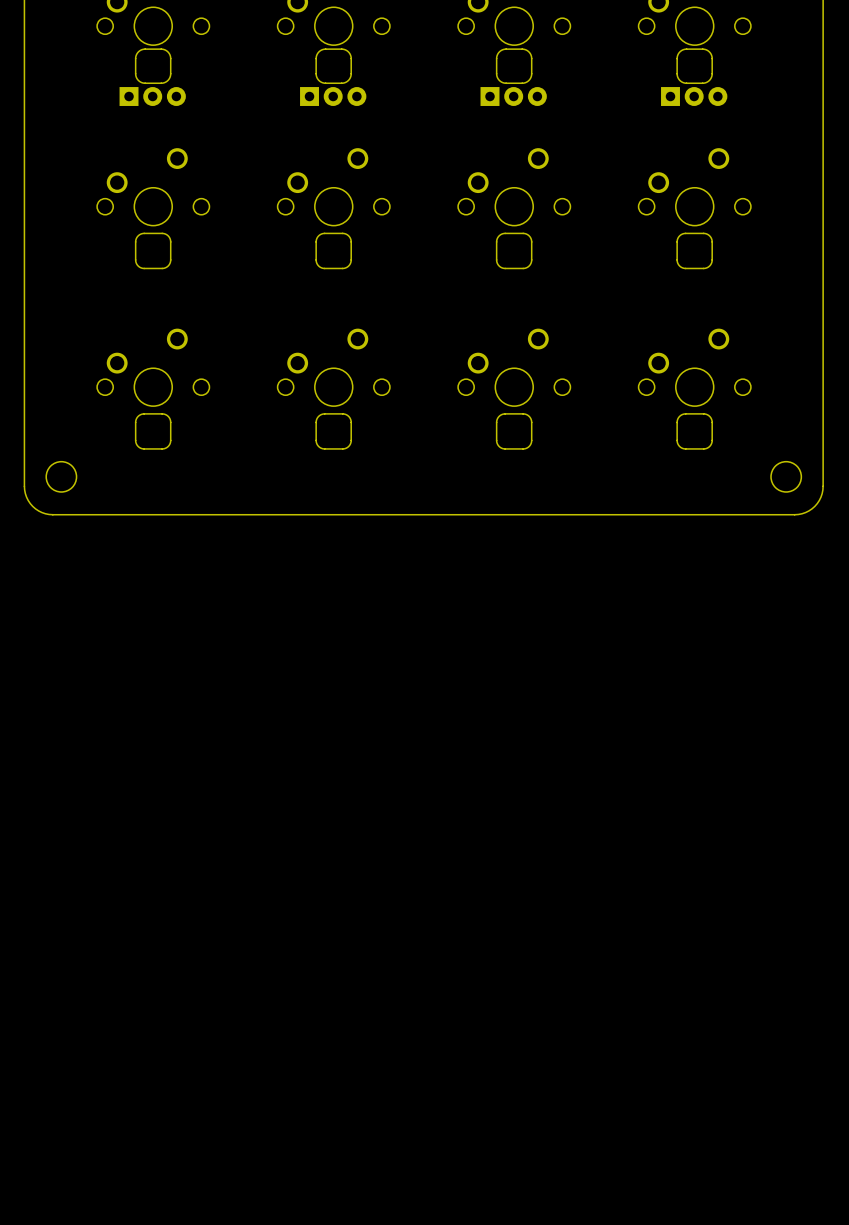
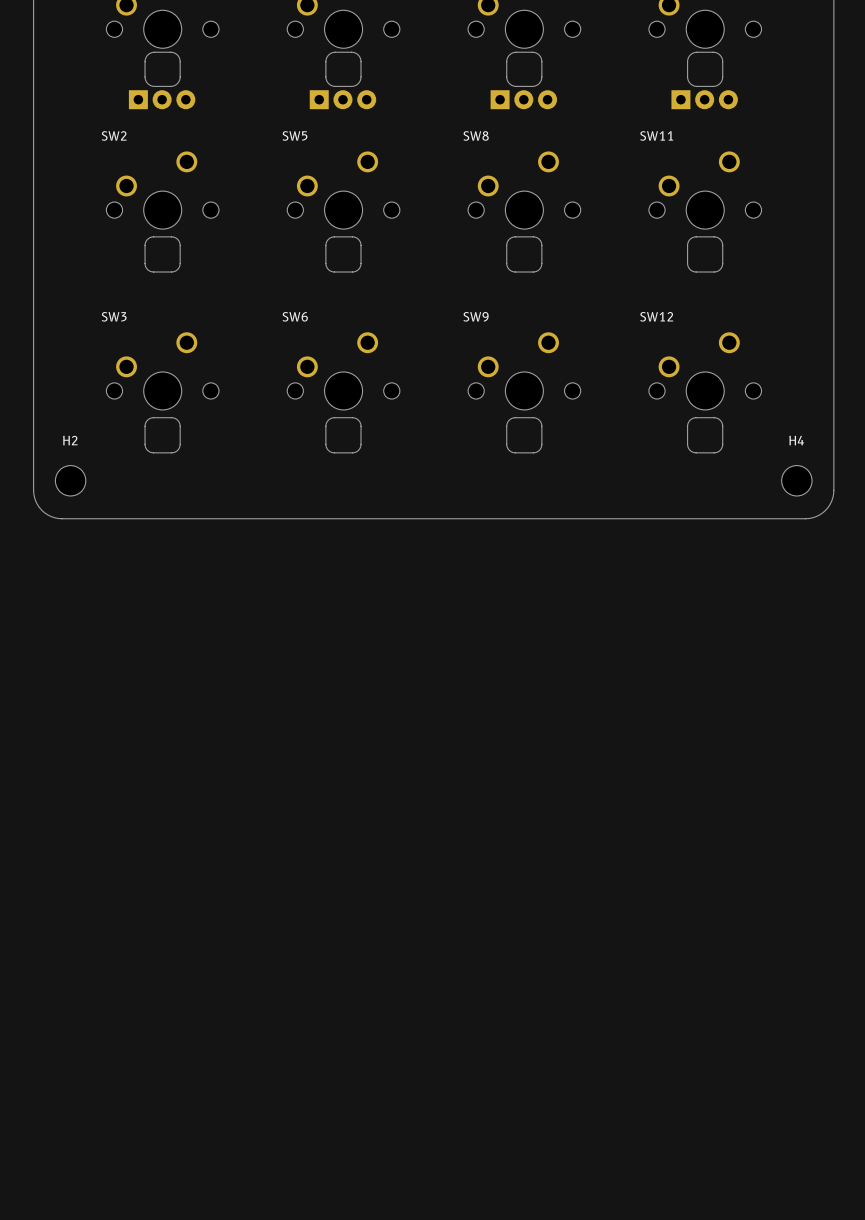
SW2 name: none -> SW2 (114, 135)
SW5 name: none -> SW5 (294, 135)
SW8 name: none -> SW8 (476, 135)
SW11 name: none -> SW11 (656, 135)
SW3 name: none -> SW3 (114, 316)
SW6 name: none -> SW6 (295, 316)
SW9 name: none -> SW9 (476, 316)
SW12 name: none -> SW12 (656, 316)
H2 name: none -> H2 (70, 440)
H4 name: none -> H4 (796, 440)

